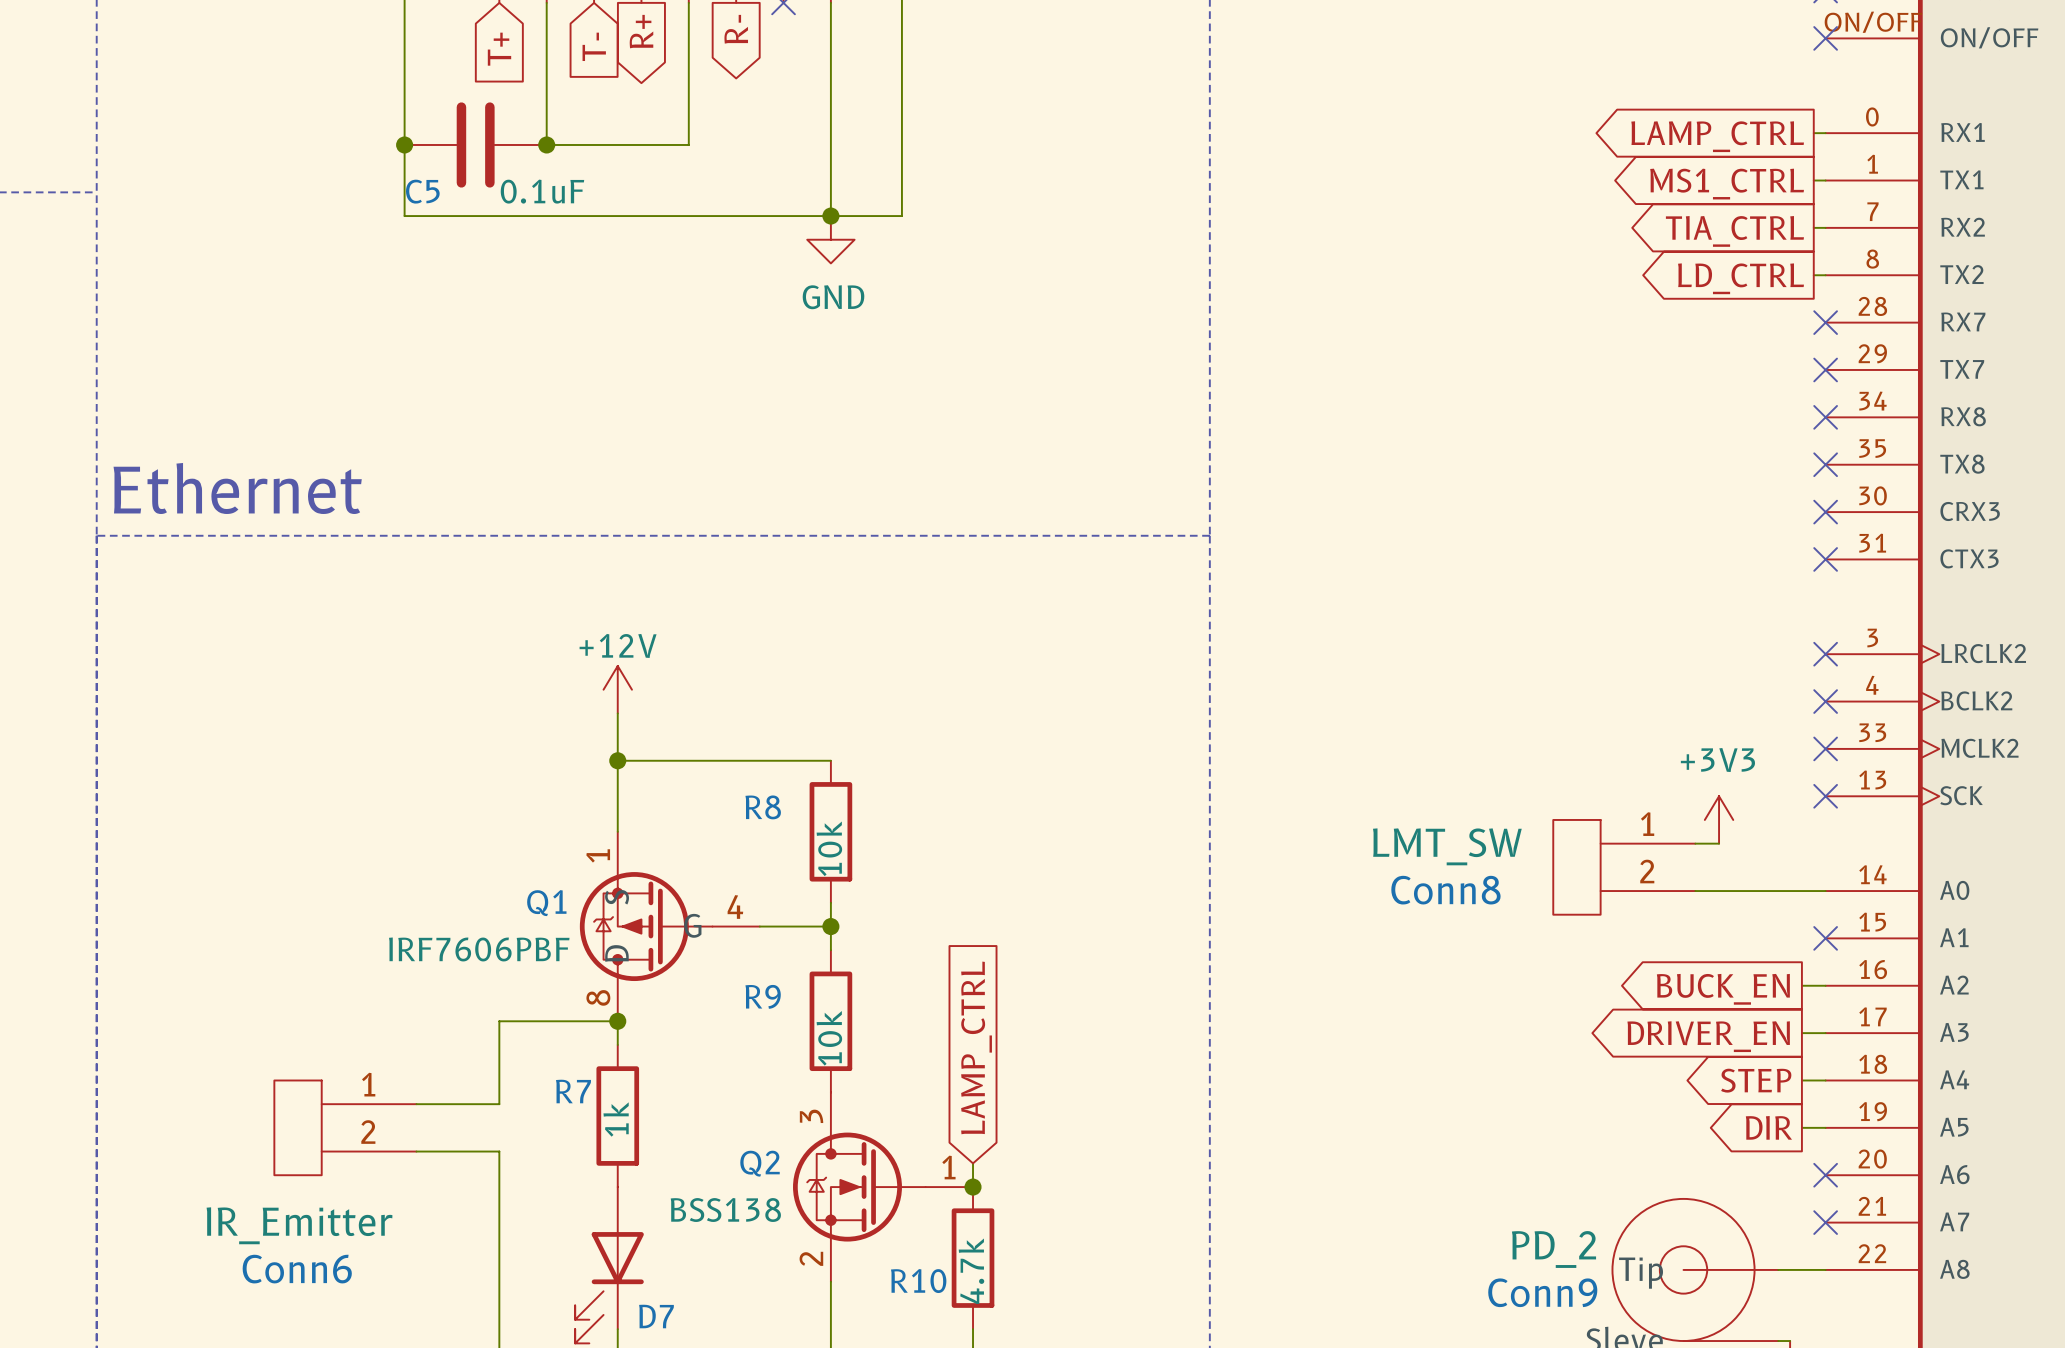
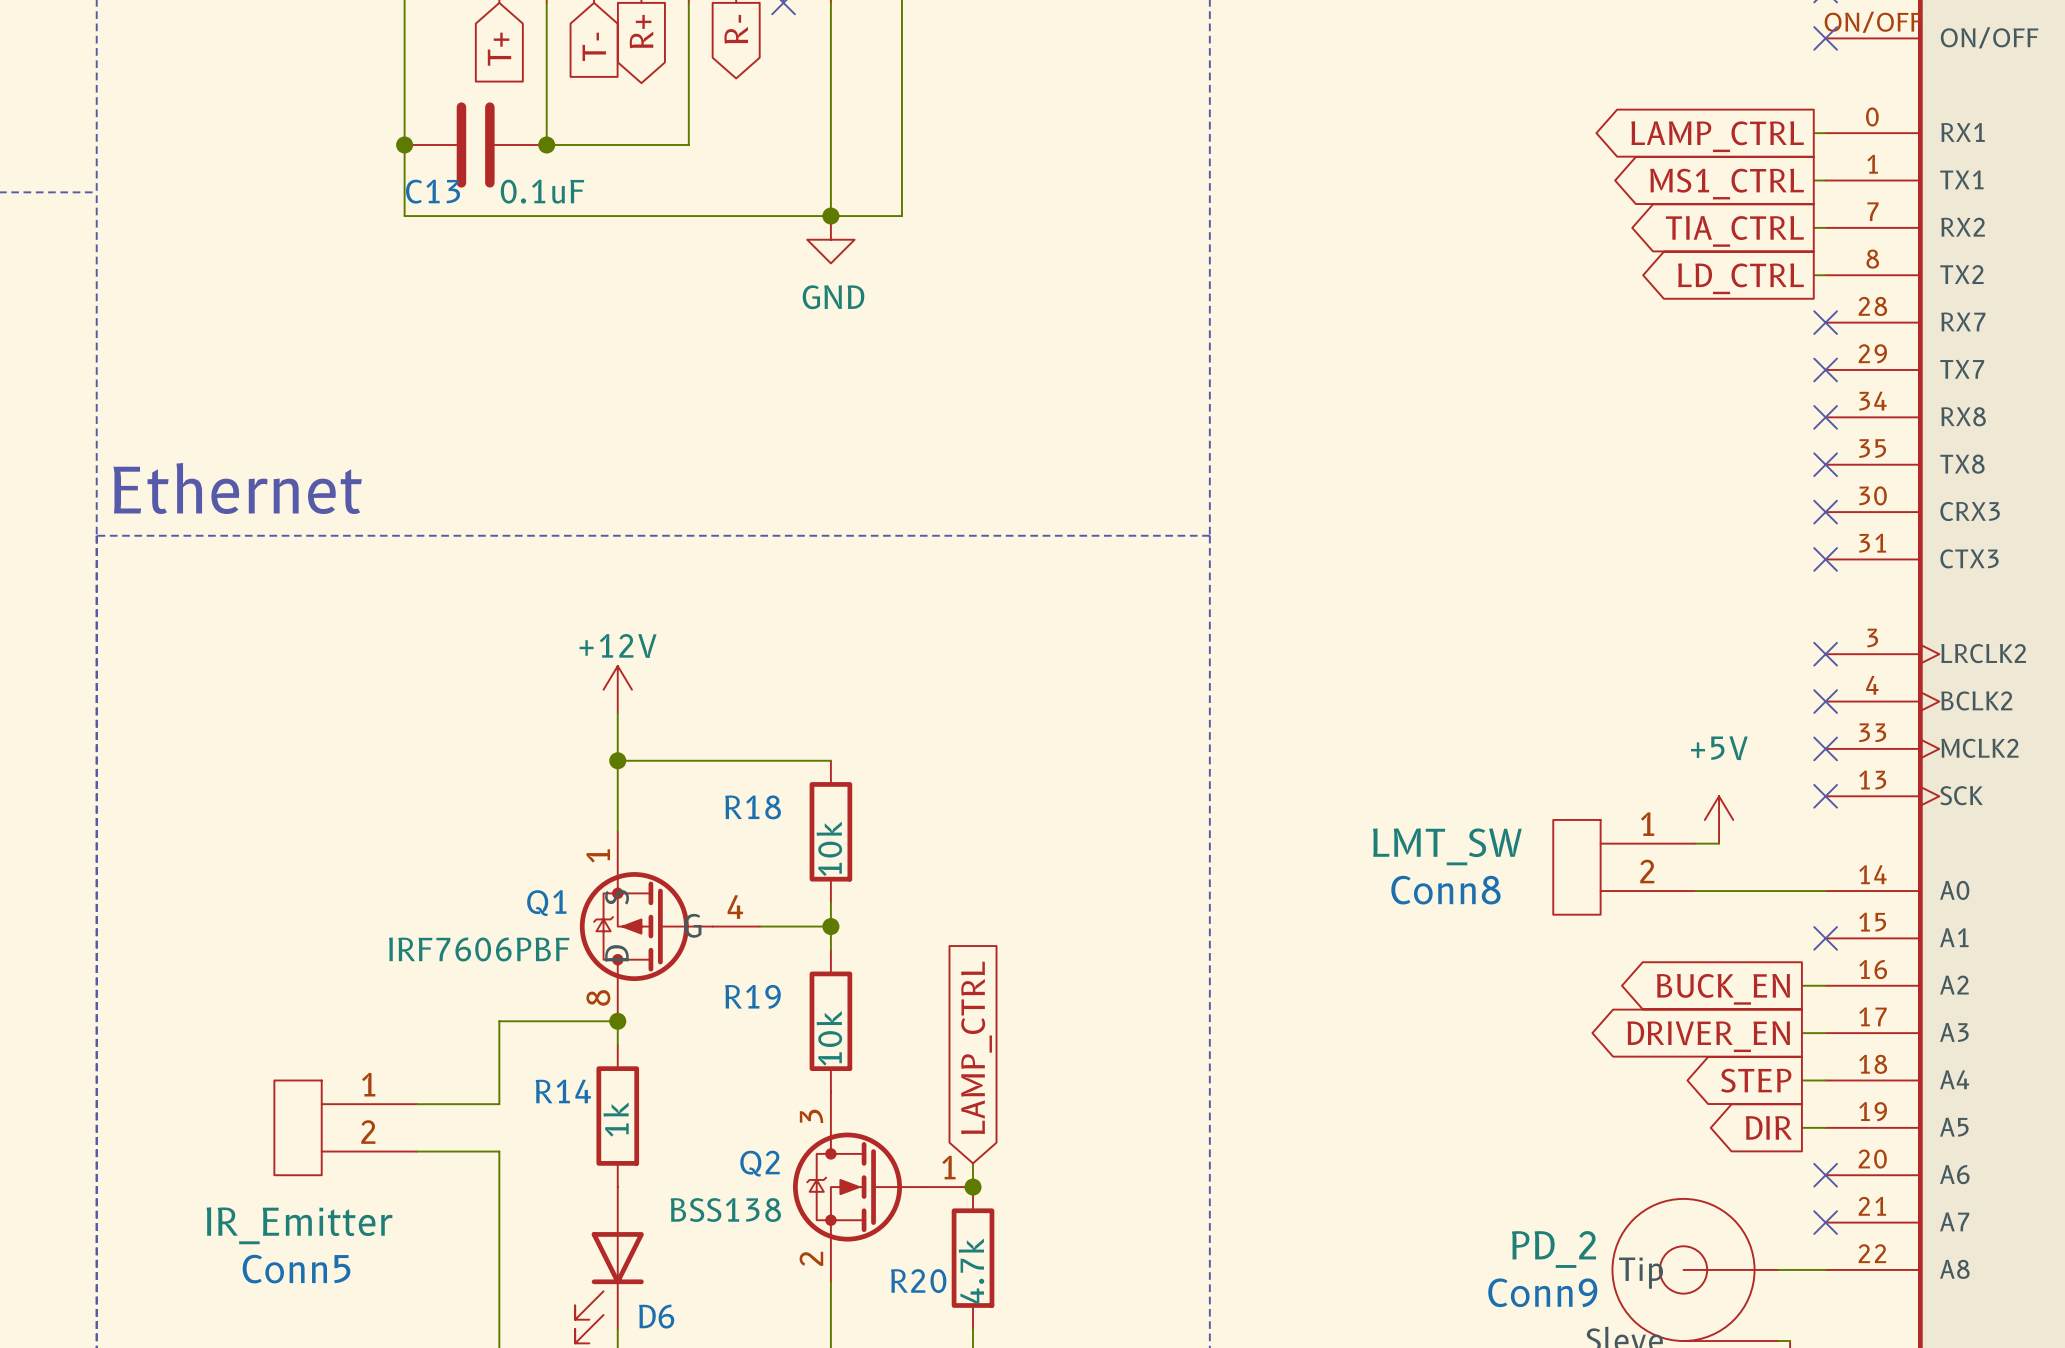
C5 name: C5 (422, 191) -> C13 (433, 191)
R8 name: R8 (763, 807) -> R18 (753, 807)
power symbol: +3V3 (1719, 819) -> +5V (1719, 819)
R9 name: R9 (763, 996) -> R19 (752, 996)
R7 name: R7 (573, 1091) -> R14 (563, 1091)
Conn6 name: Conn6 (297, 1269) -> Conn5 (296, 1269)
R10 name: R10 (918, 1281) -> R20 (918, 1281)
D7 name: D7 (656, 1316) -> D6 (656, 1316)

